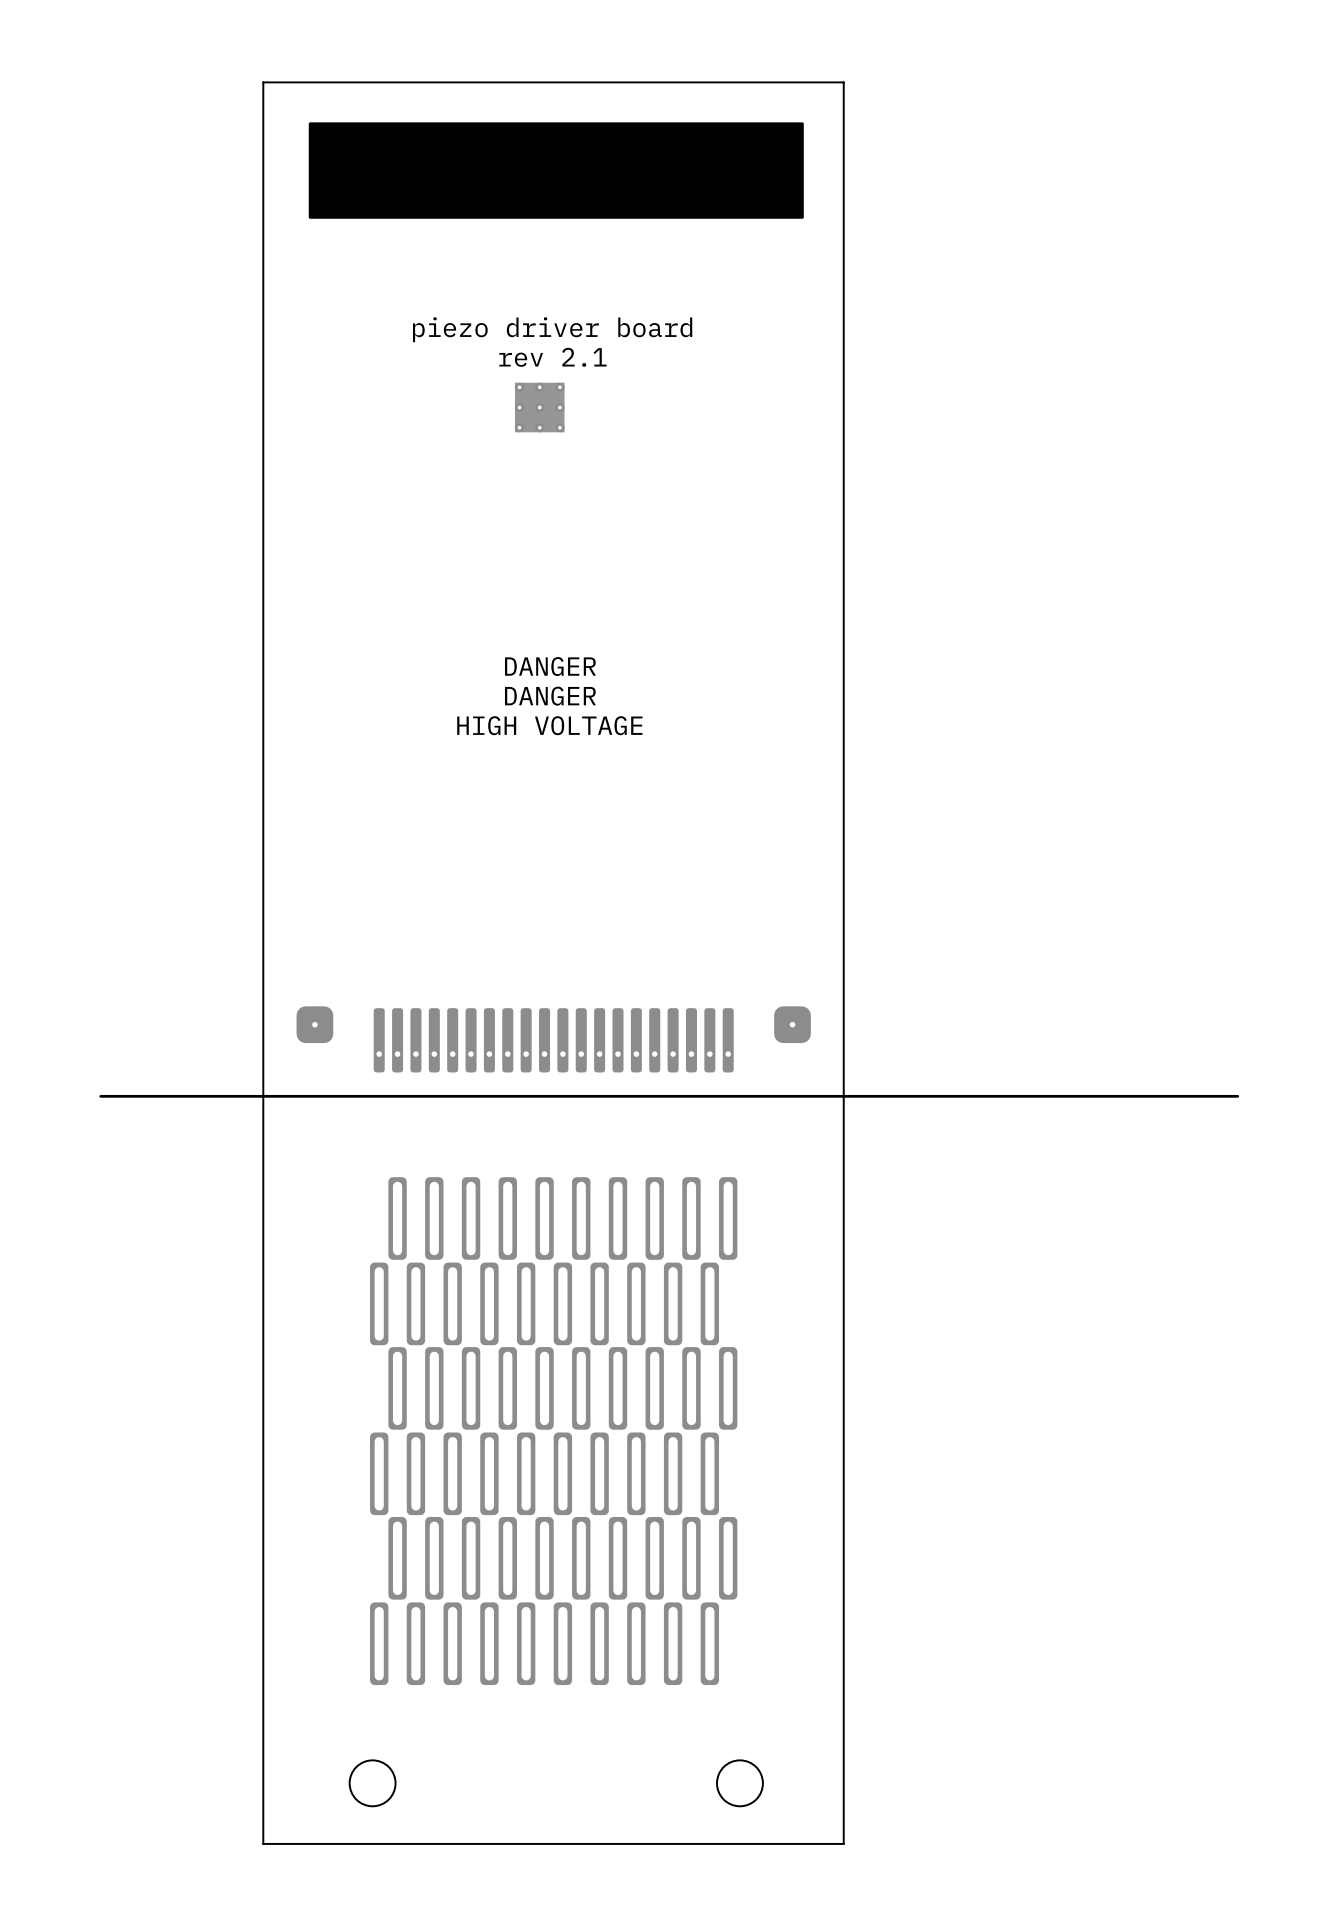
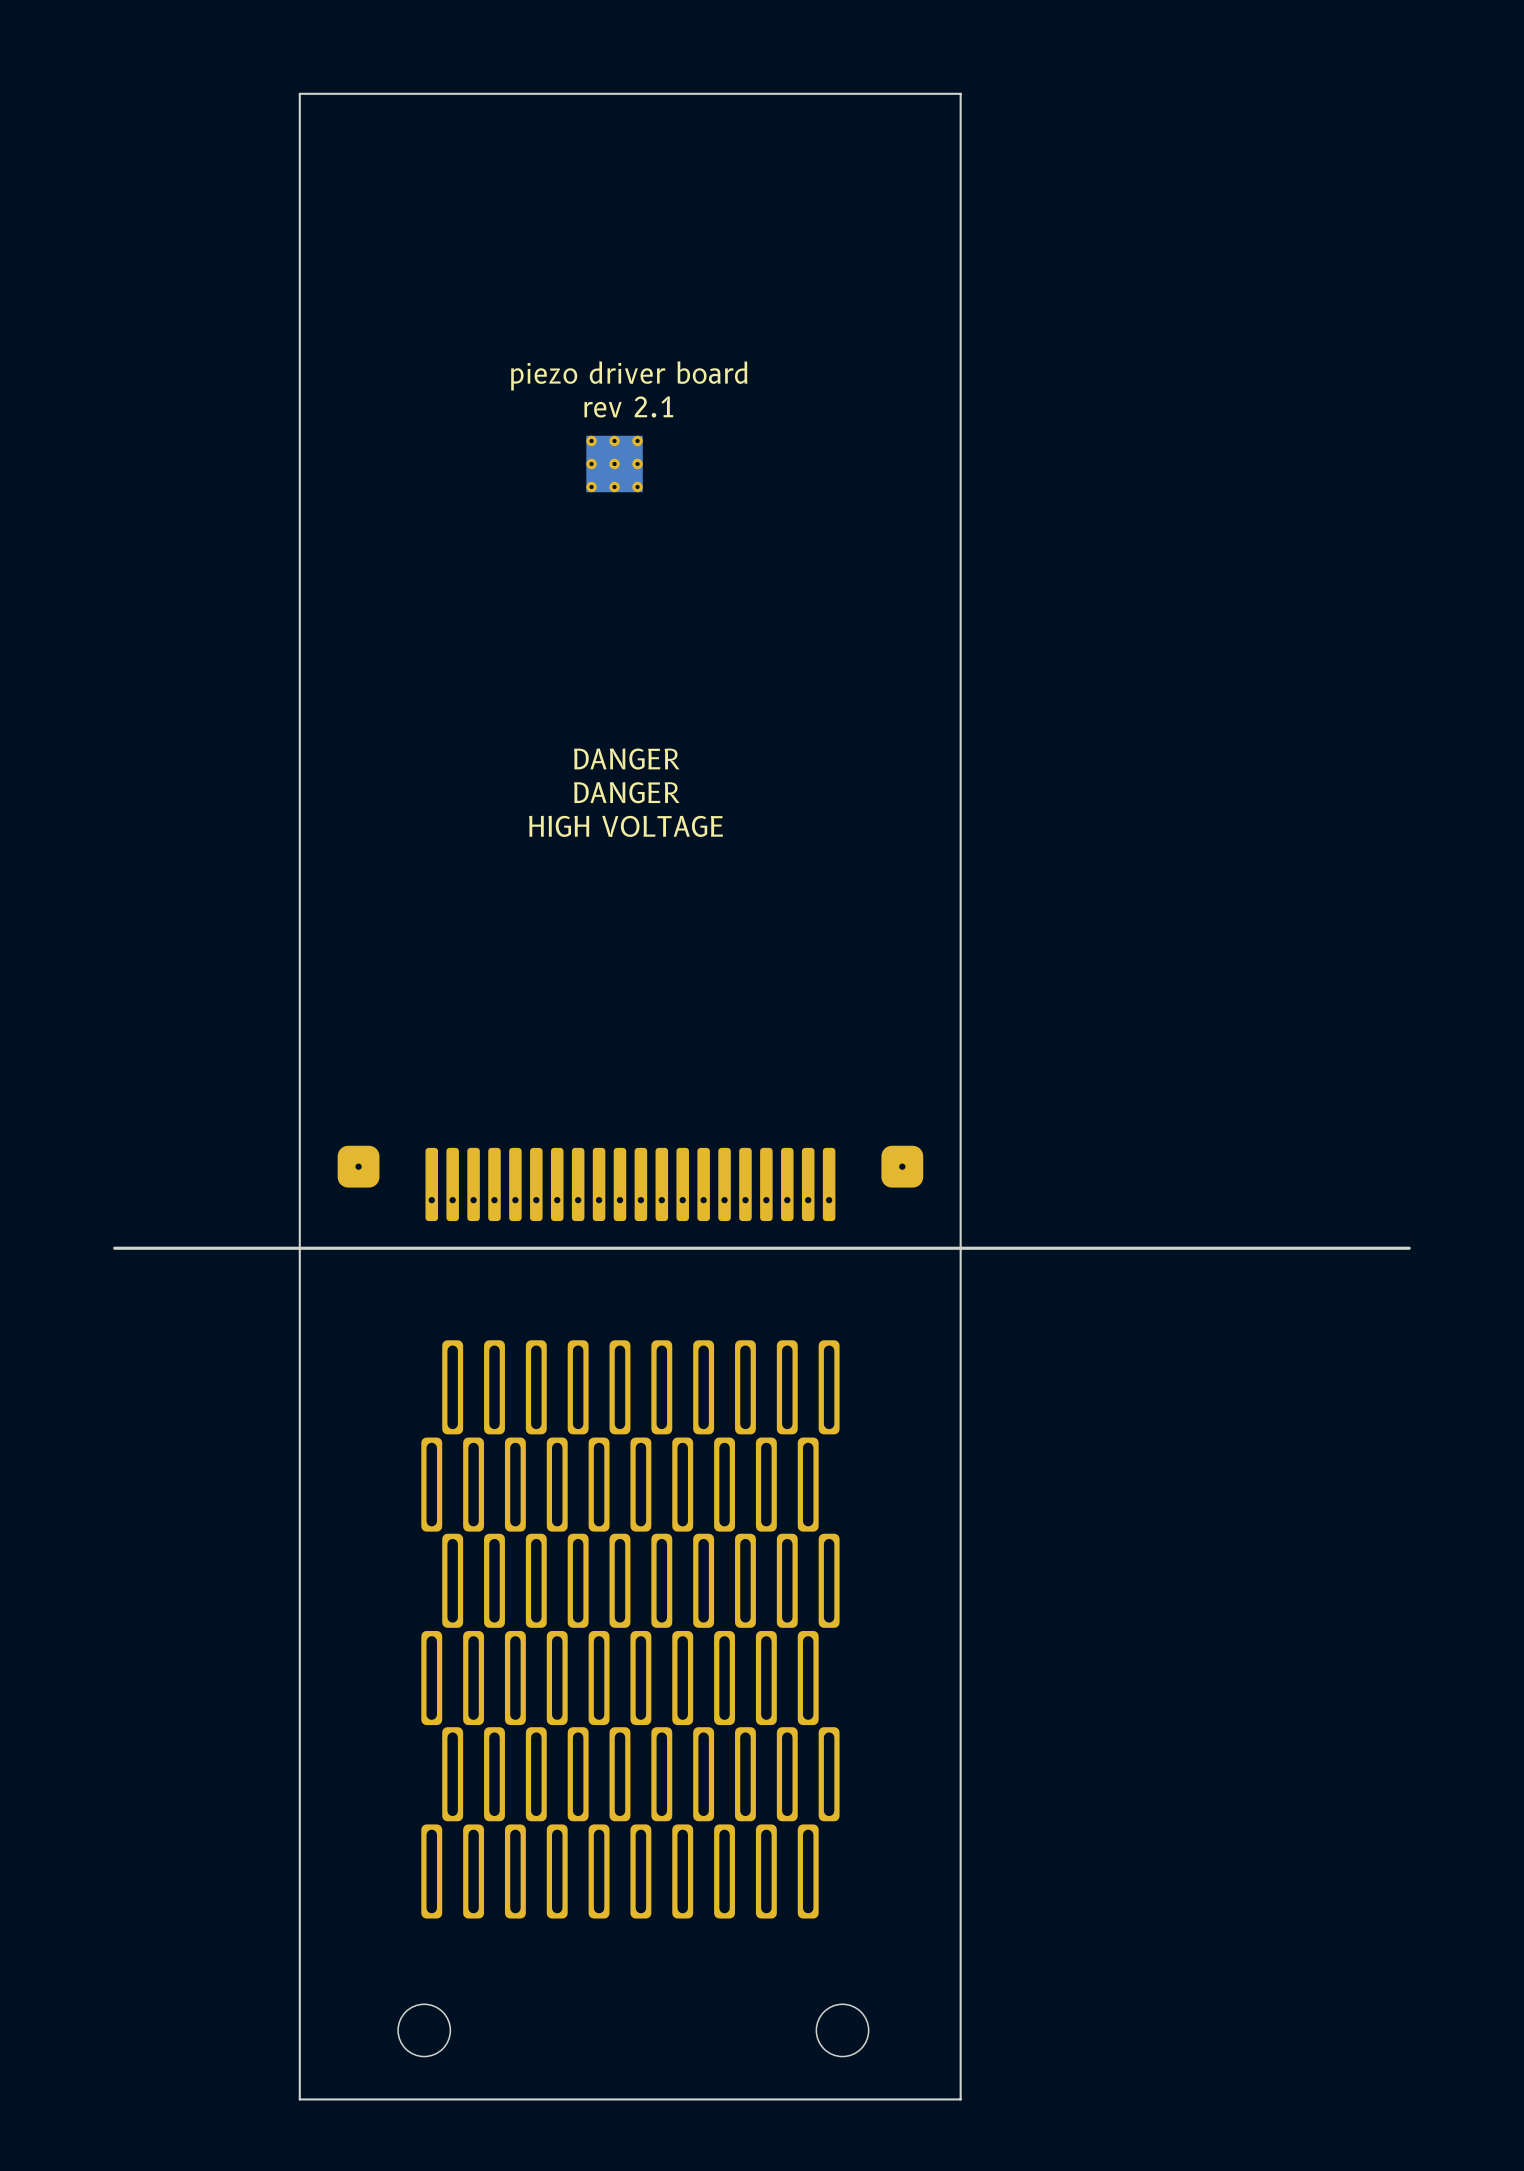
drawing: [308, 122, 804, 219] -> none

